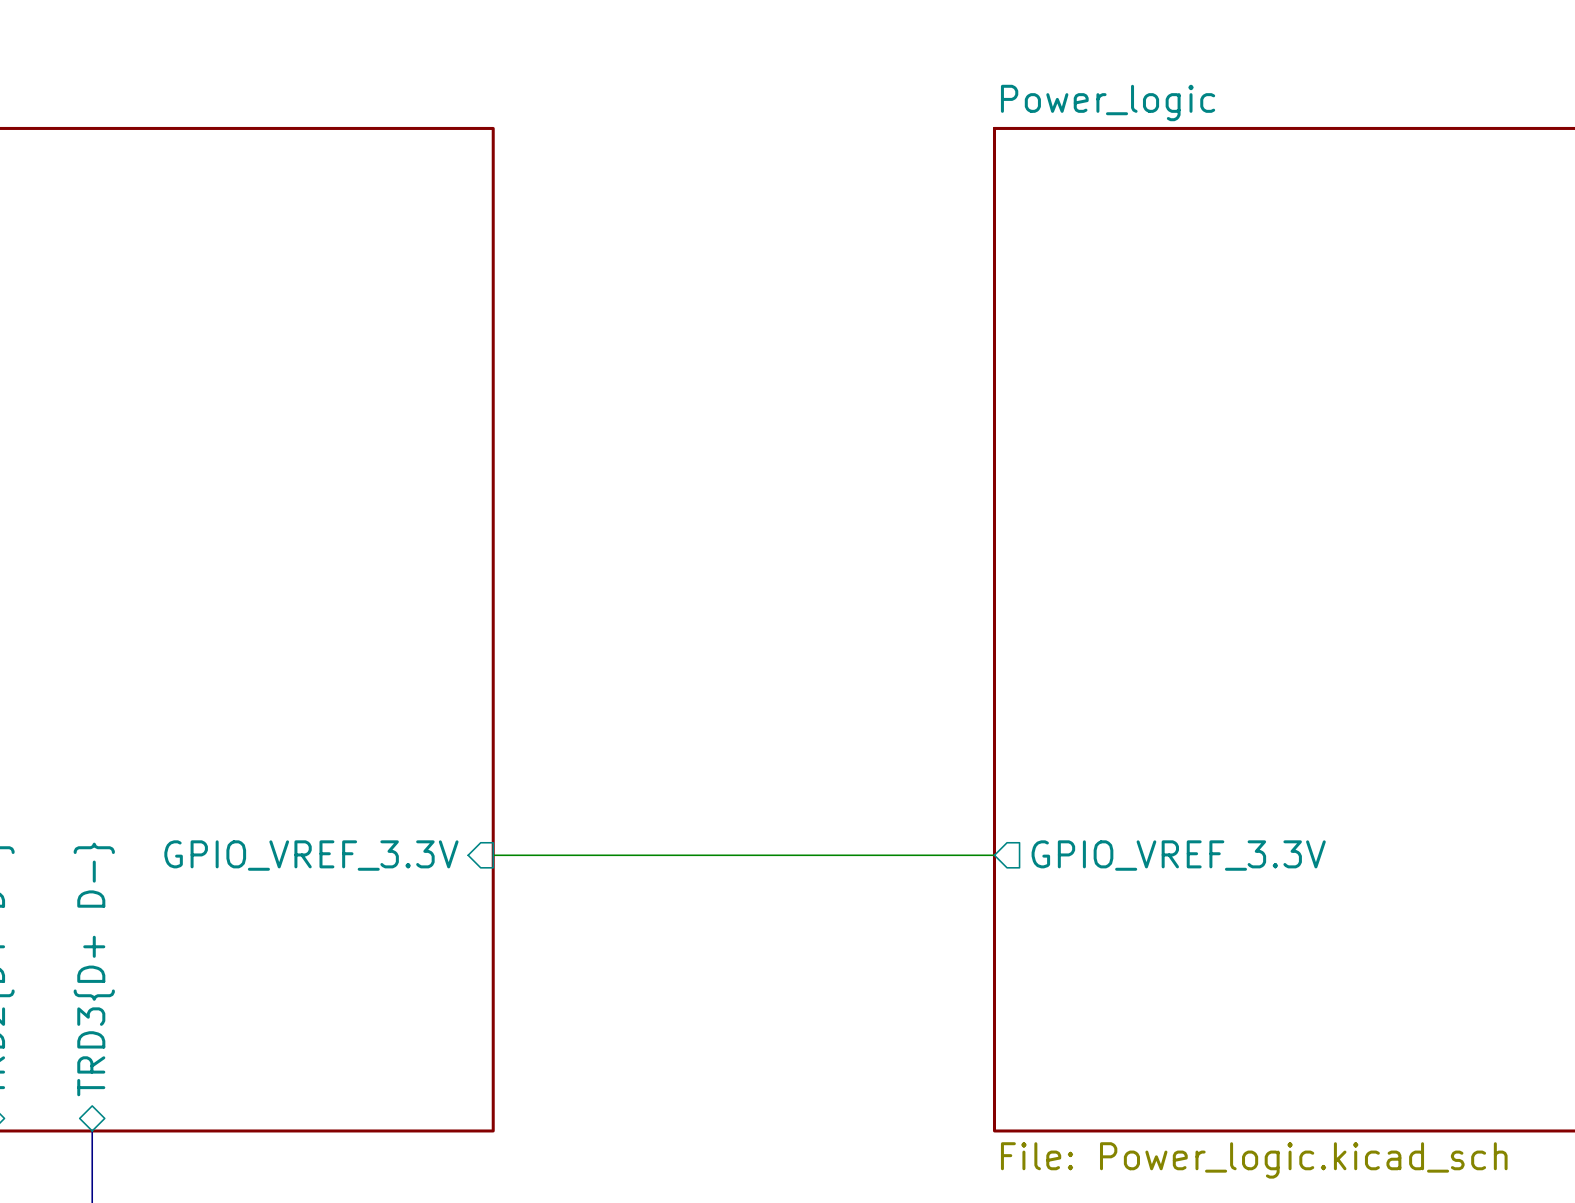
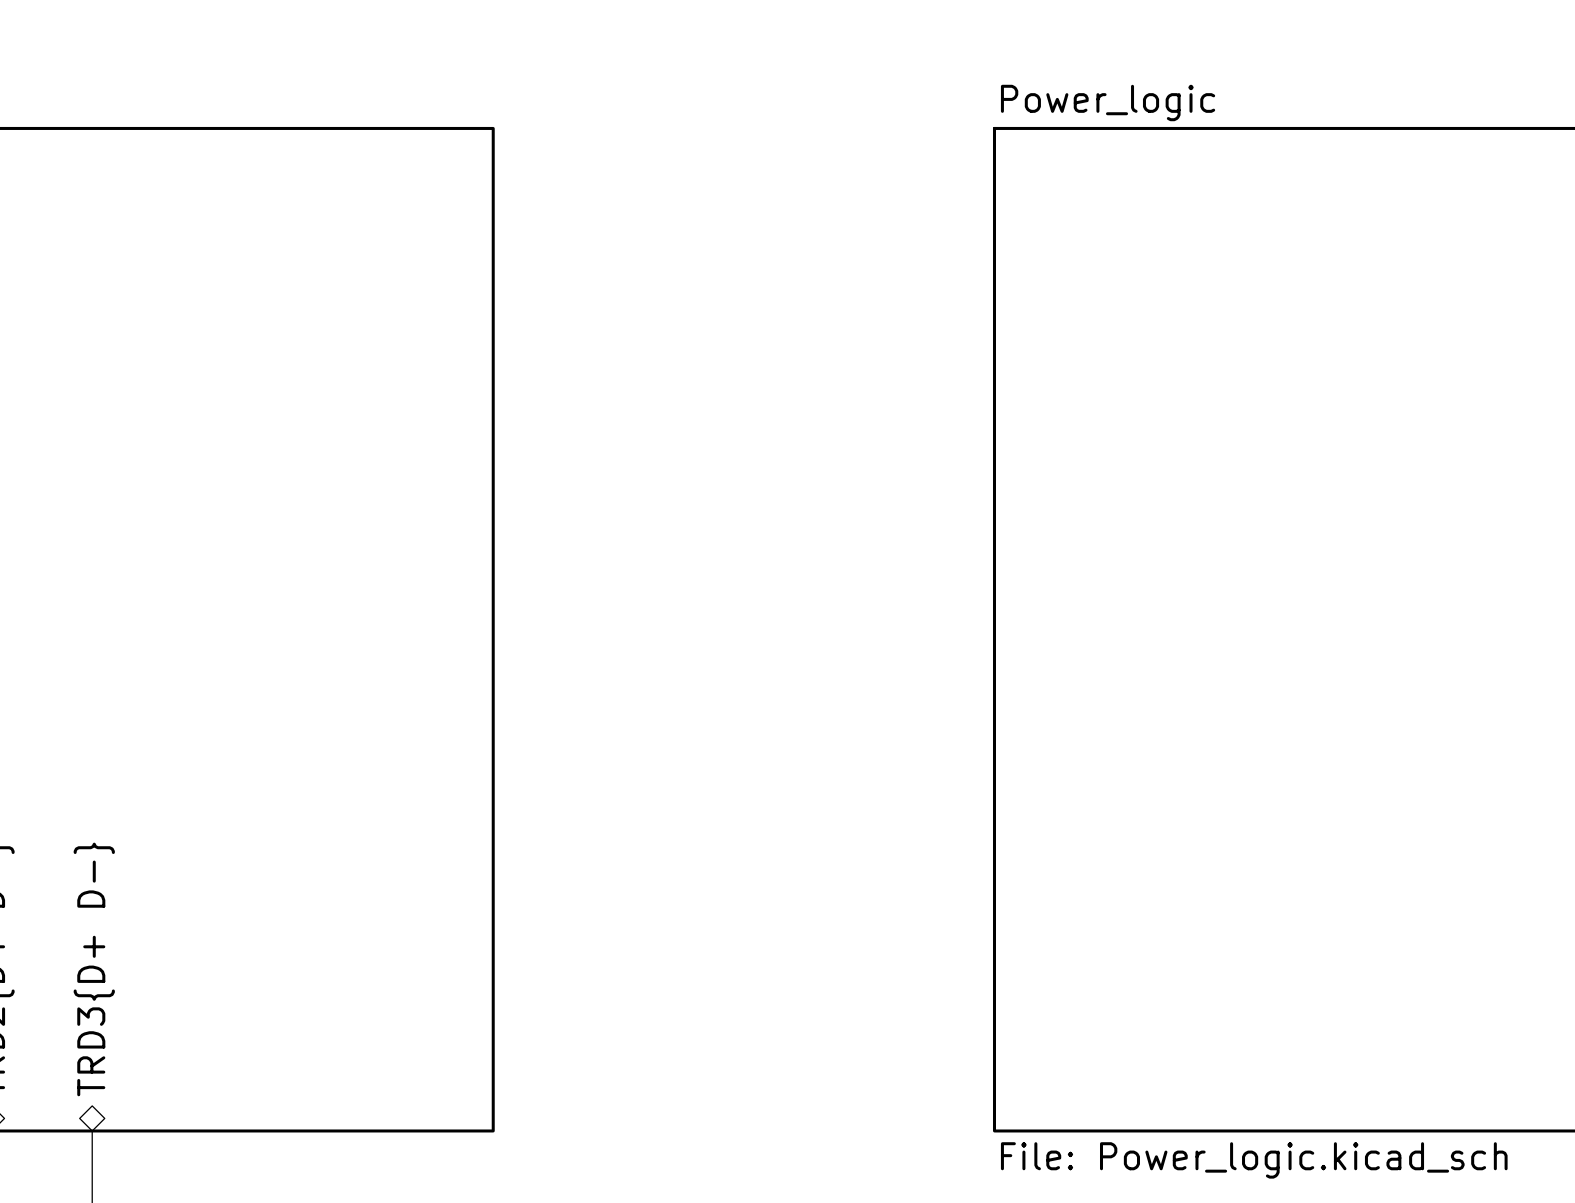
sheet pin: GPIO_VREF_3.3V (311, 855) -> none
wire: (493, 855) (994, 855) -> none
sheet pin: GPIO_VREF_3.3V (1178, 855) -> none

